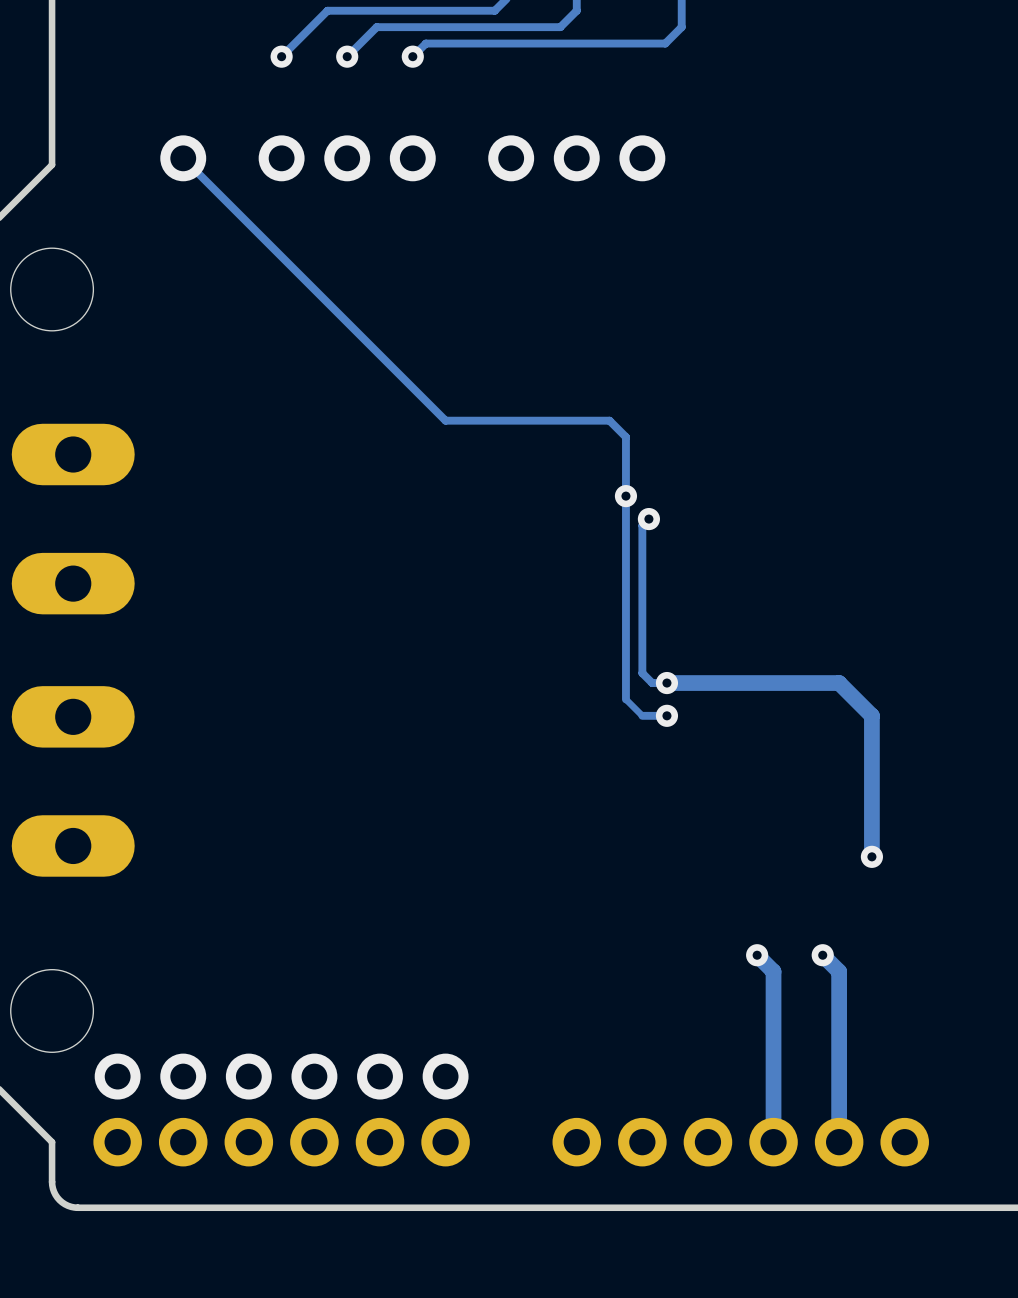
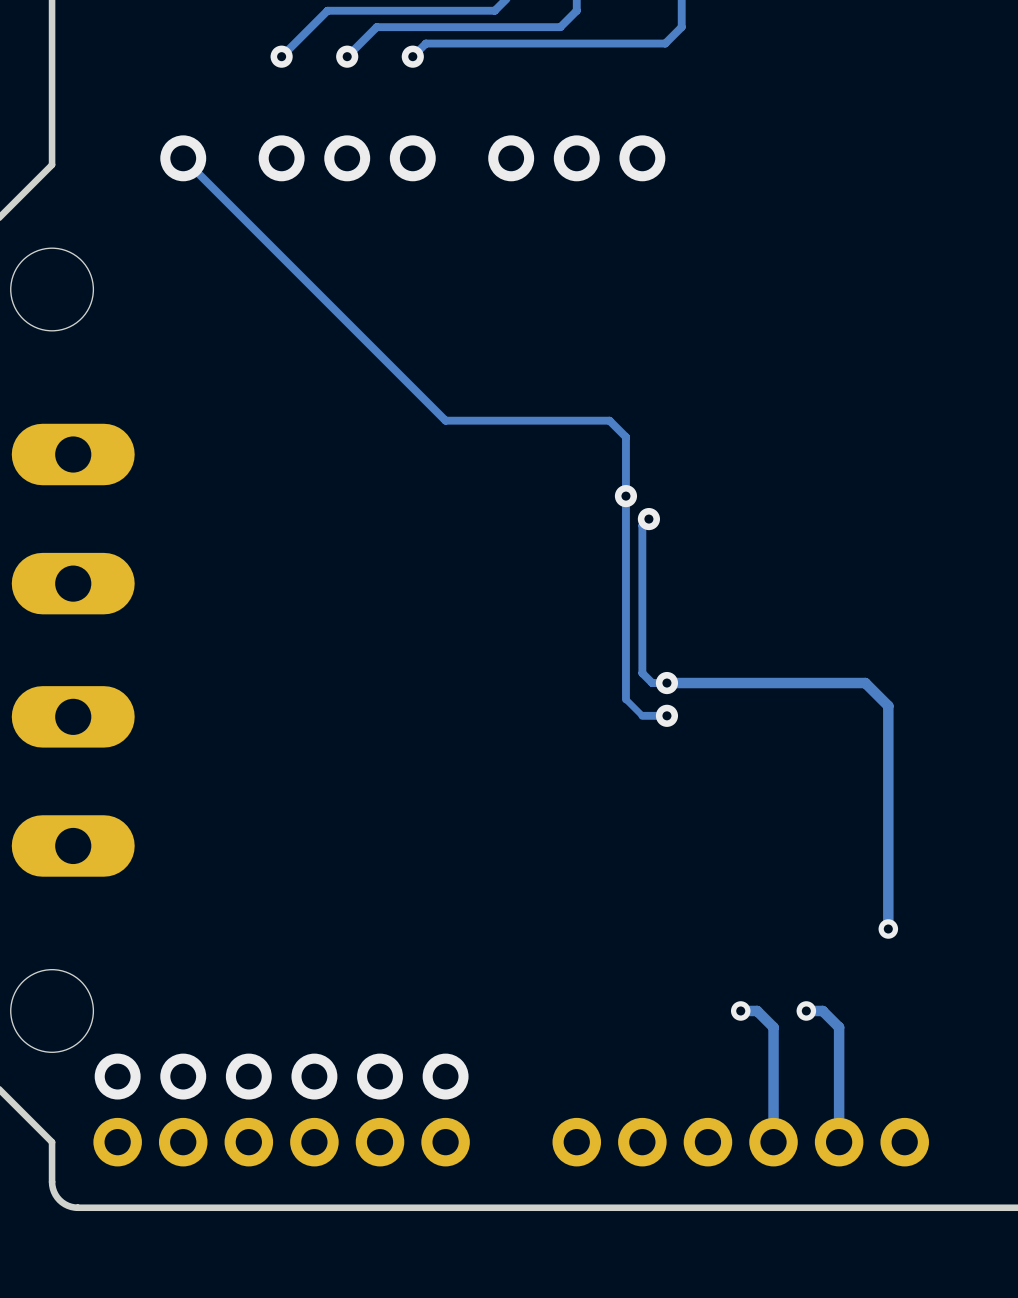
track: (839, 683) (871, 715) (871, 856) -> (839, 683) (865, 683) (888, 705) (888, 928)
track width: thick (839, 683) (666, 683) -> thin (839, 683) (666, 683)
via: (871, 856) -> none
via: none -> (888, 928)
track: (757, 955) (773, 971) (773, 1027) -> (740, 1010) (757, 1010) (773, 1027)
via: (757, 955) -> none
track: (822, 955) (839, 971) (839, 1027) -> (806, 1010) (822, 1010) (839, 1027)
via: (822, 955) -> none
via: none -> (740, 1010)
via: none -> (806, 1010)
track width: thick (773, 1027) (773, 1142) -> thin (773, 1027) (773, 1142)
track width: thick (839, 1027) (839, 1142) -> thin (839, 1027) (839, 1142)

